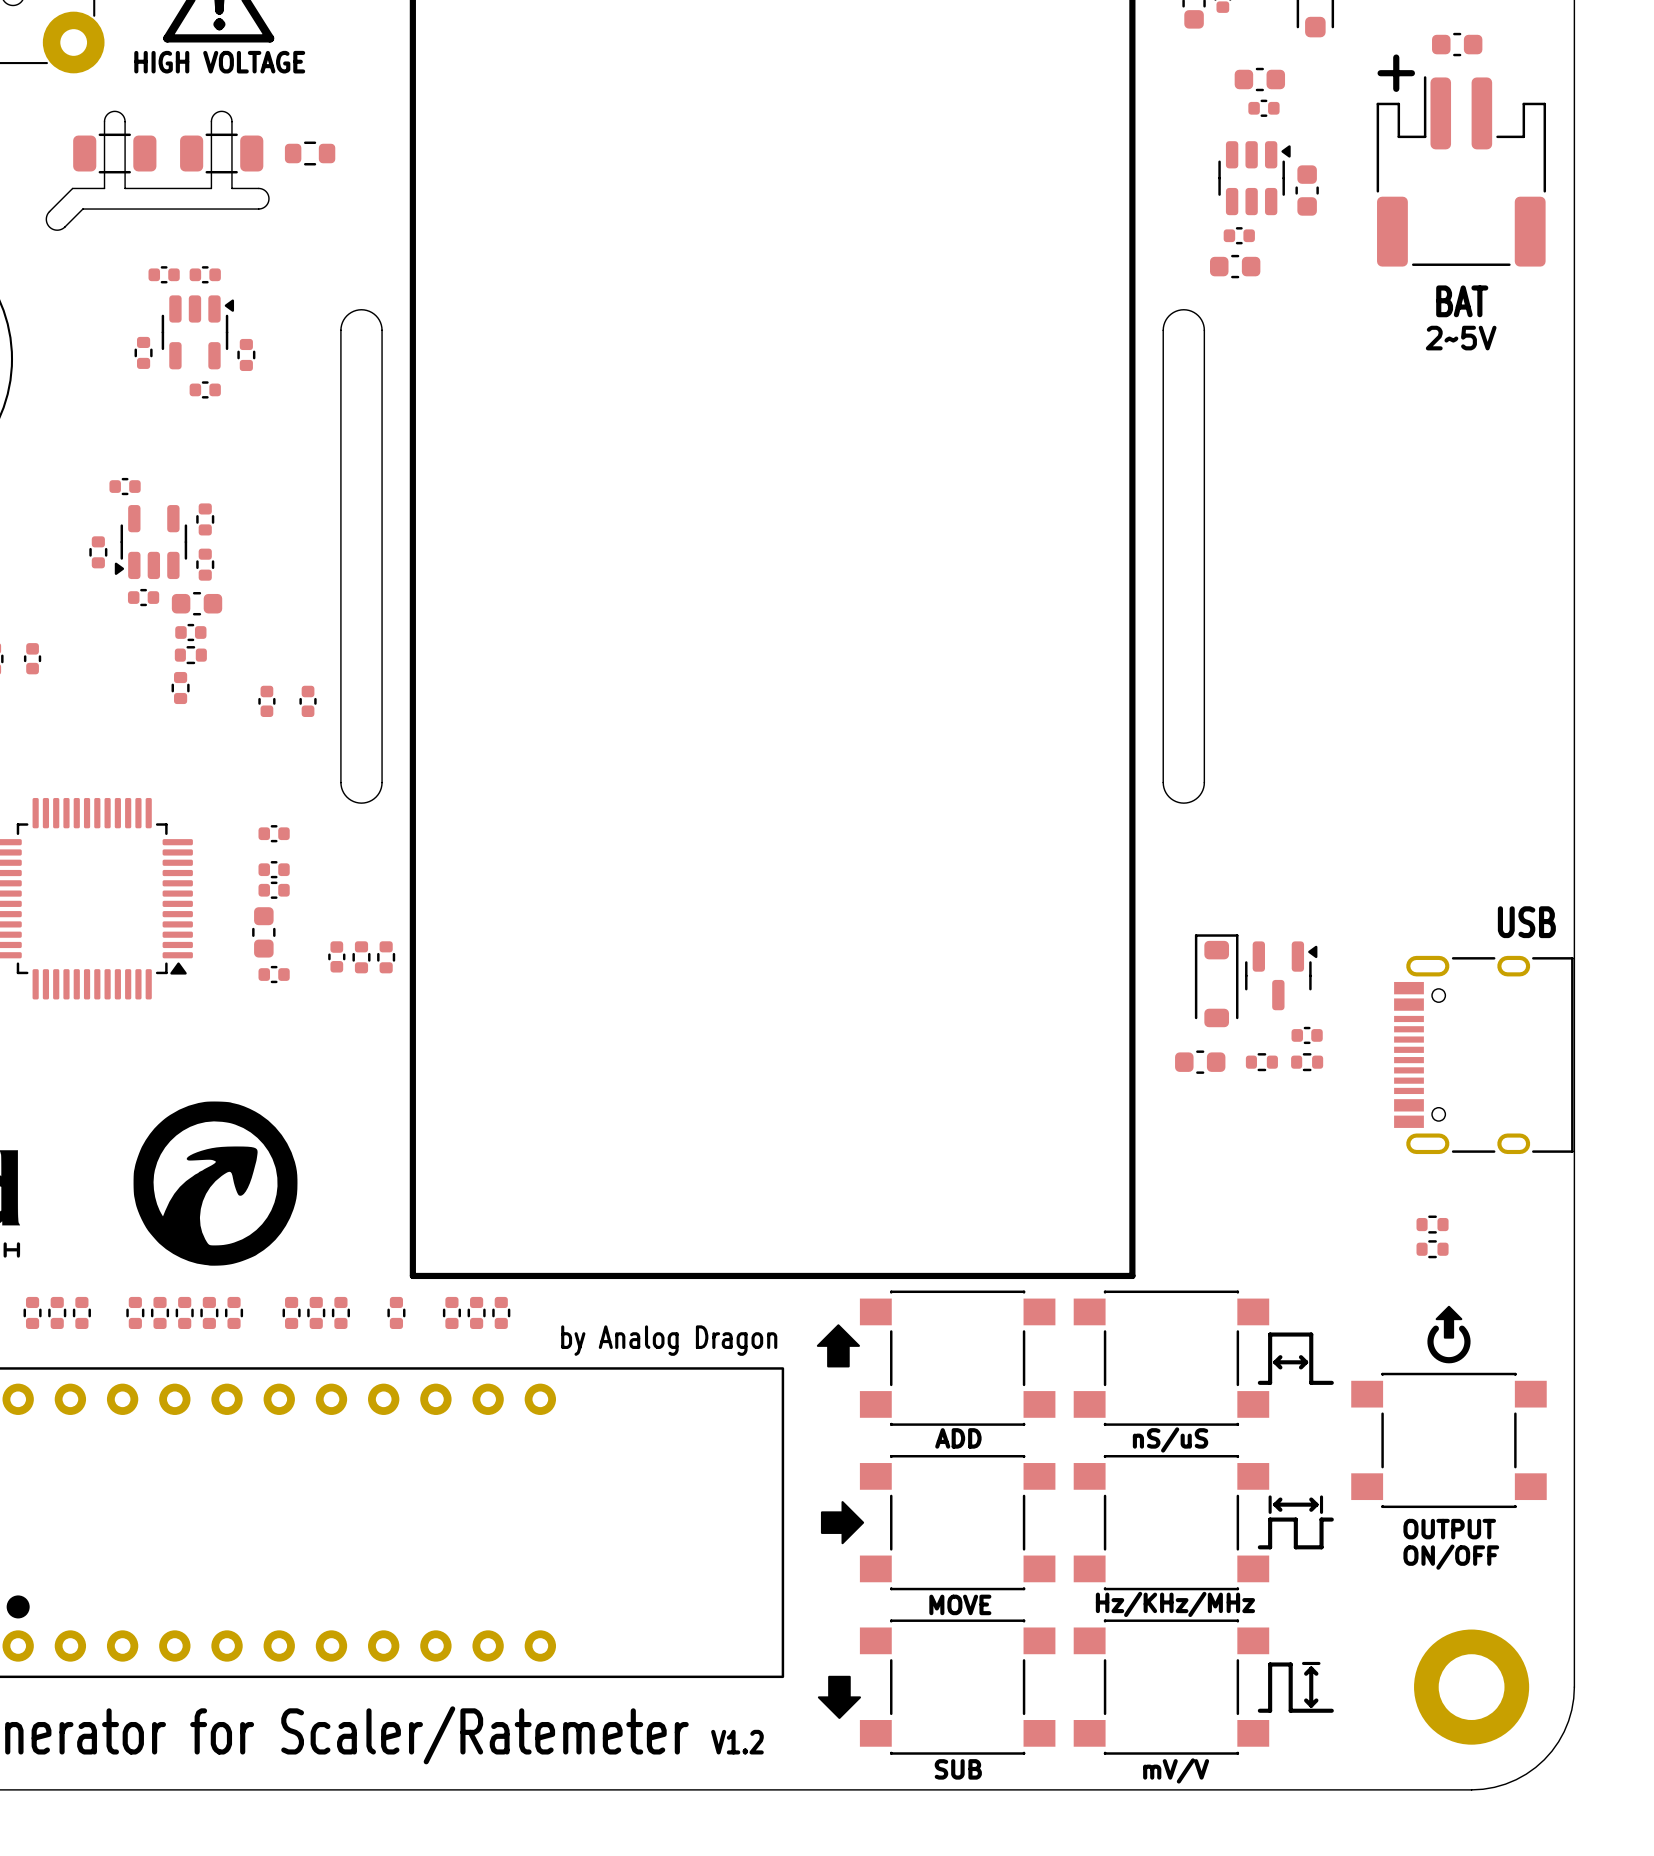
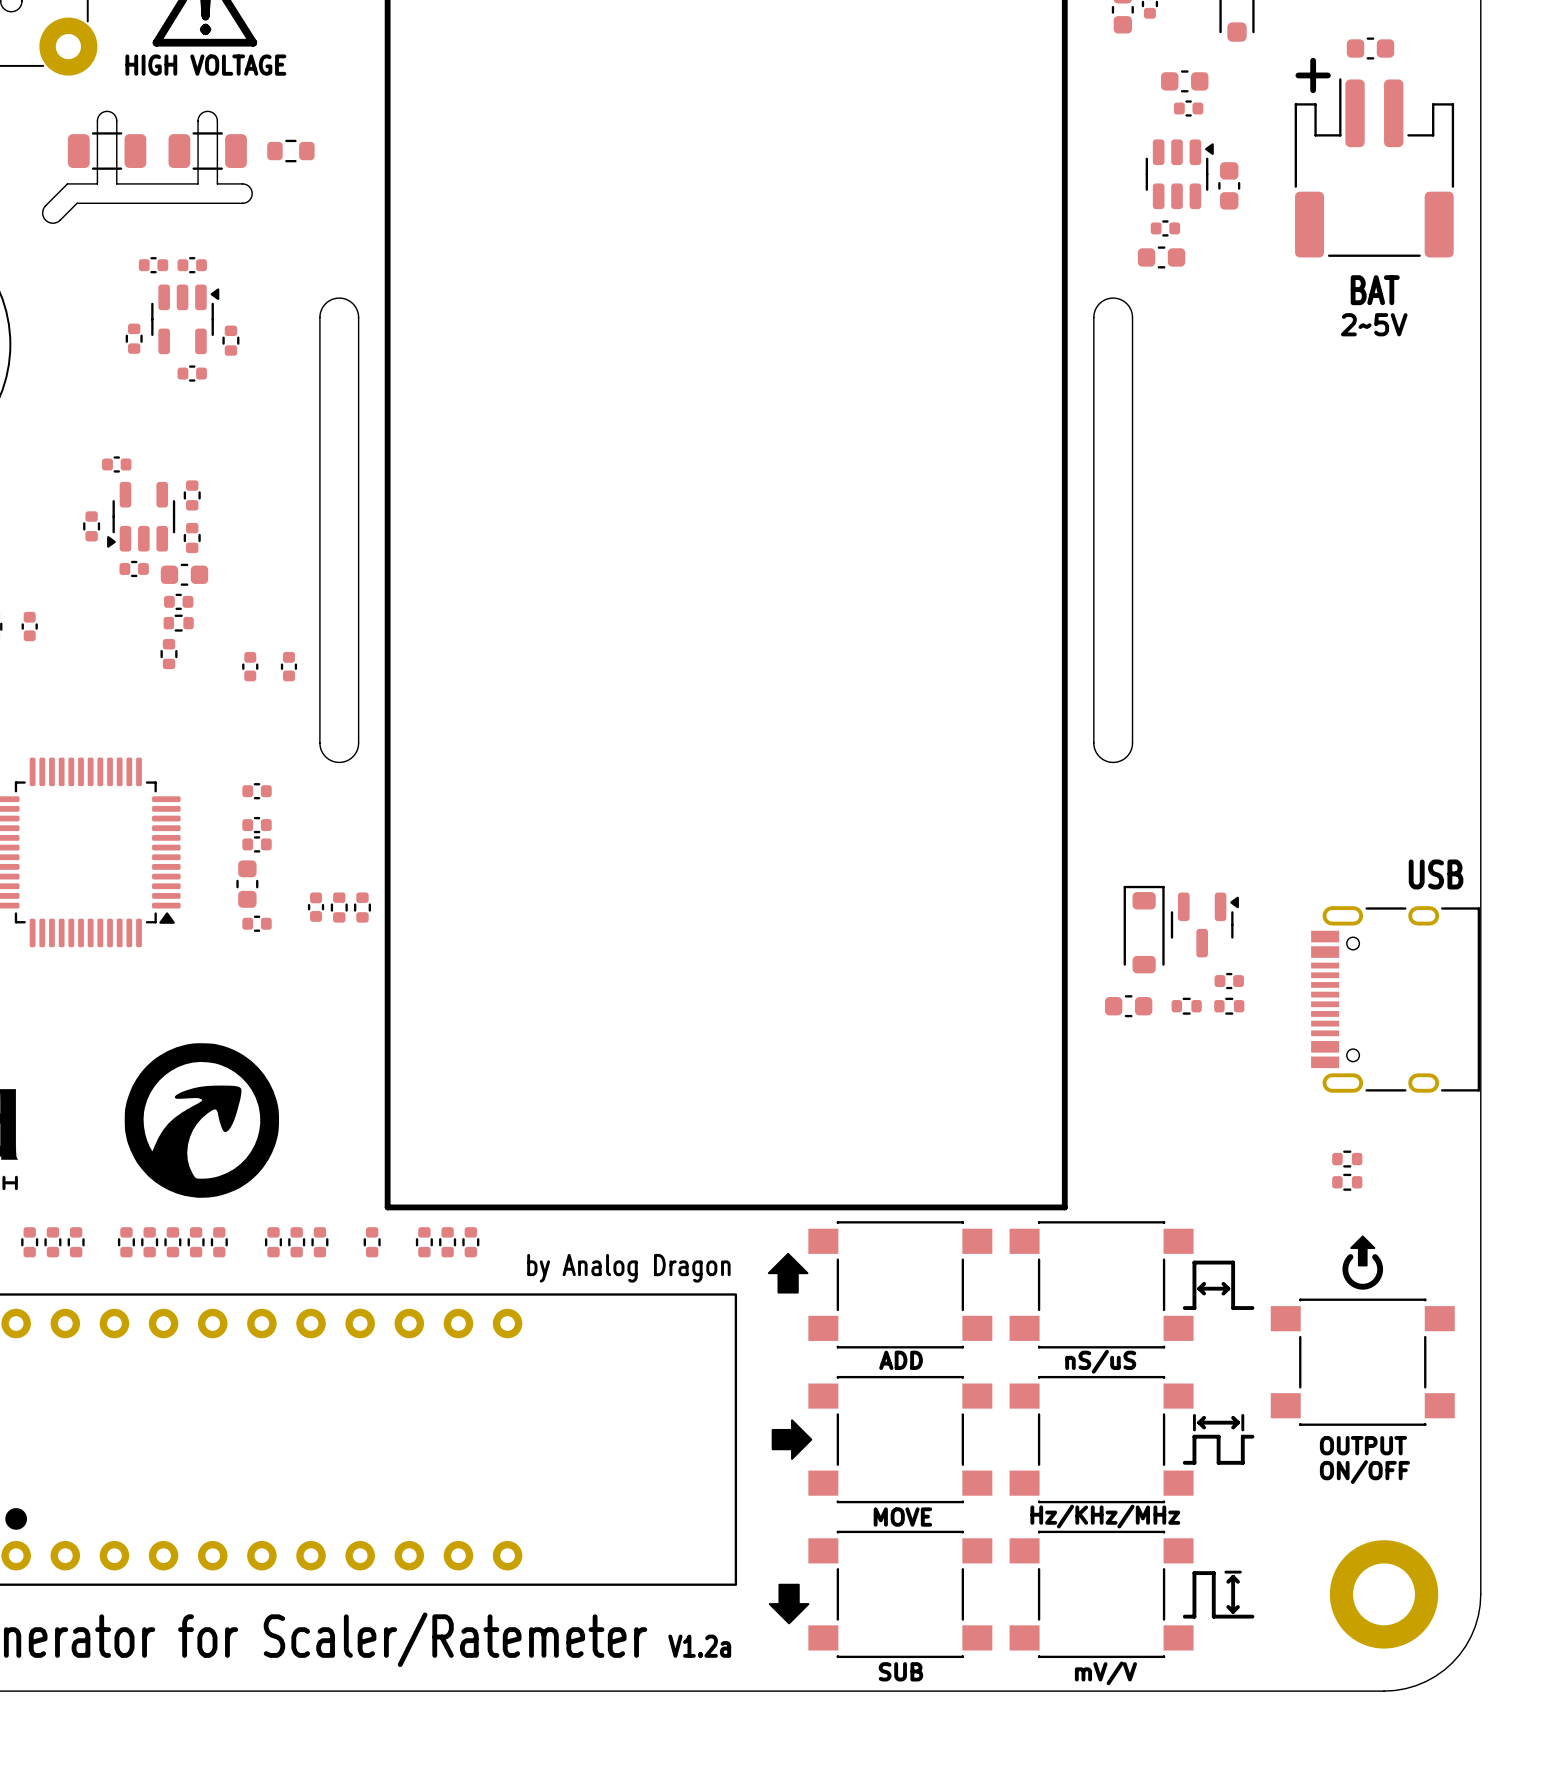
text: V1.2 (737, 1742) -> V1.2a (699, 1646)

